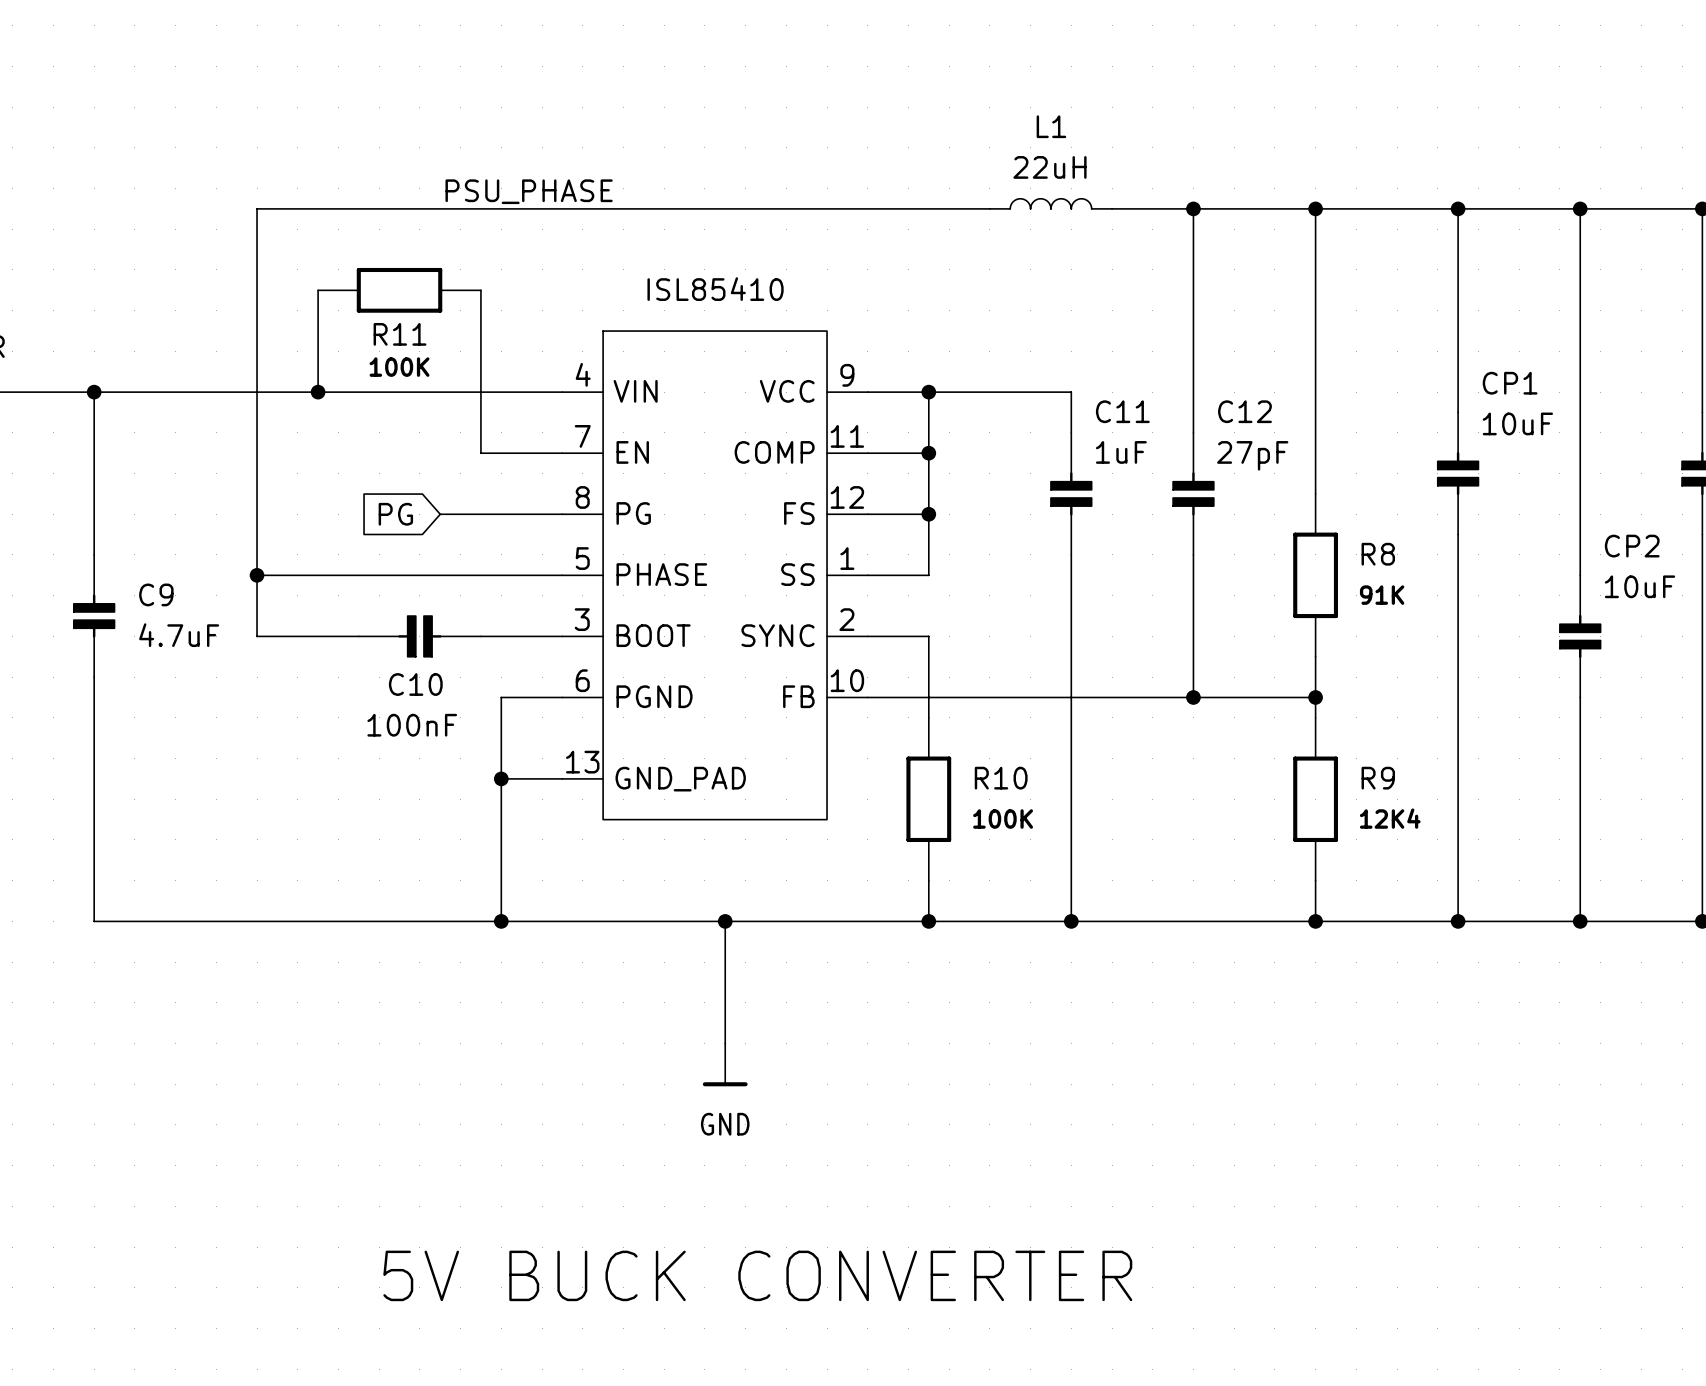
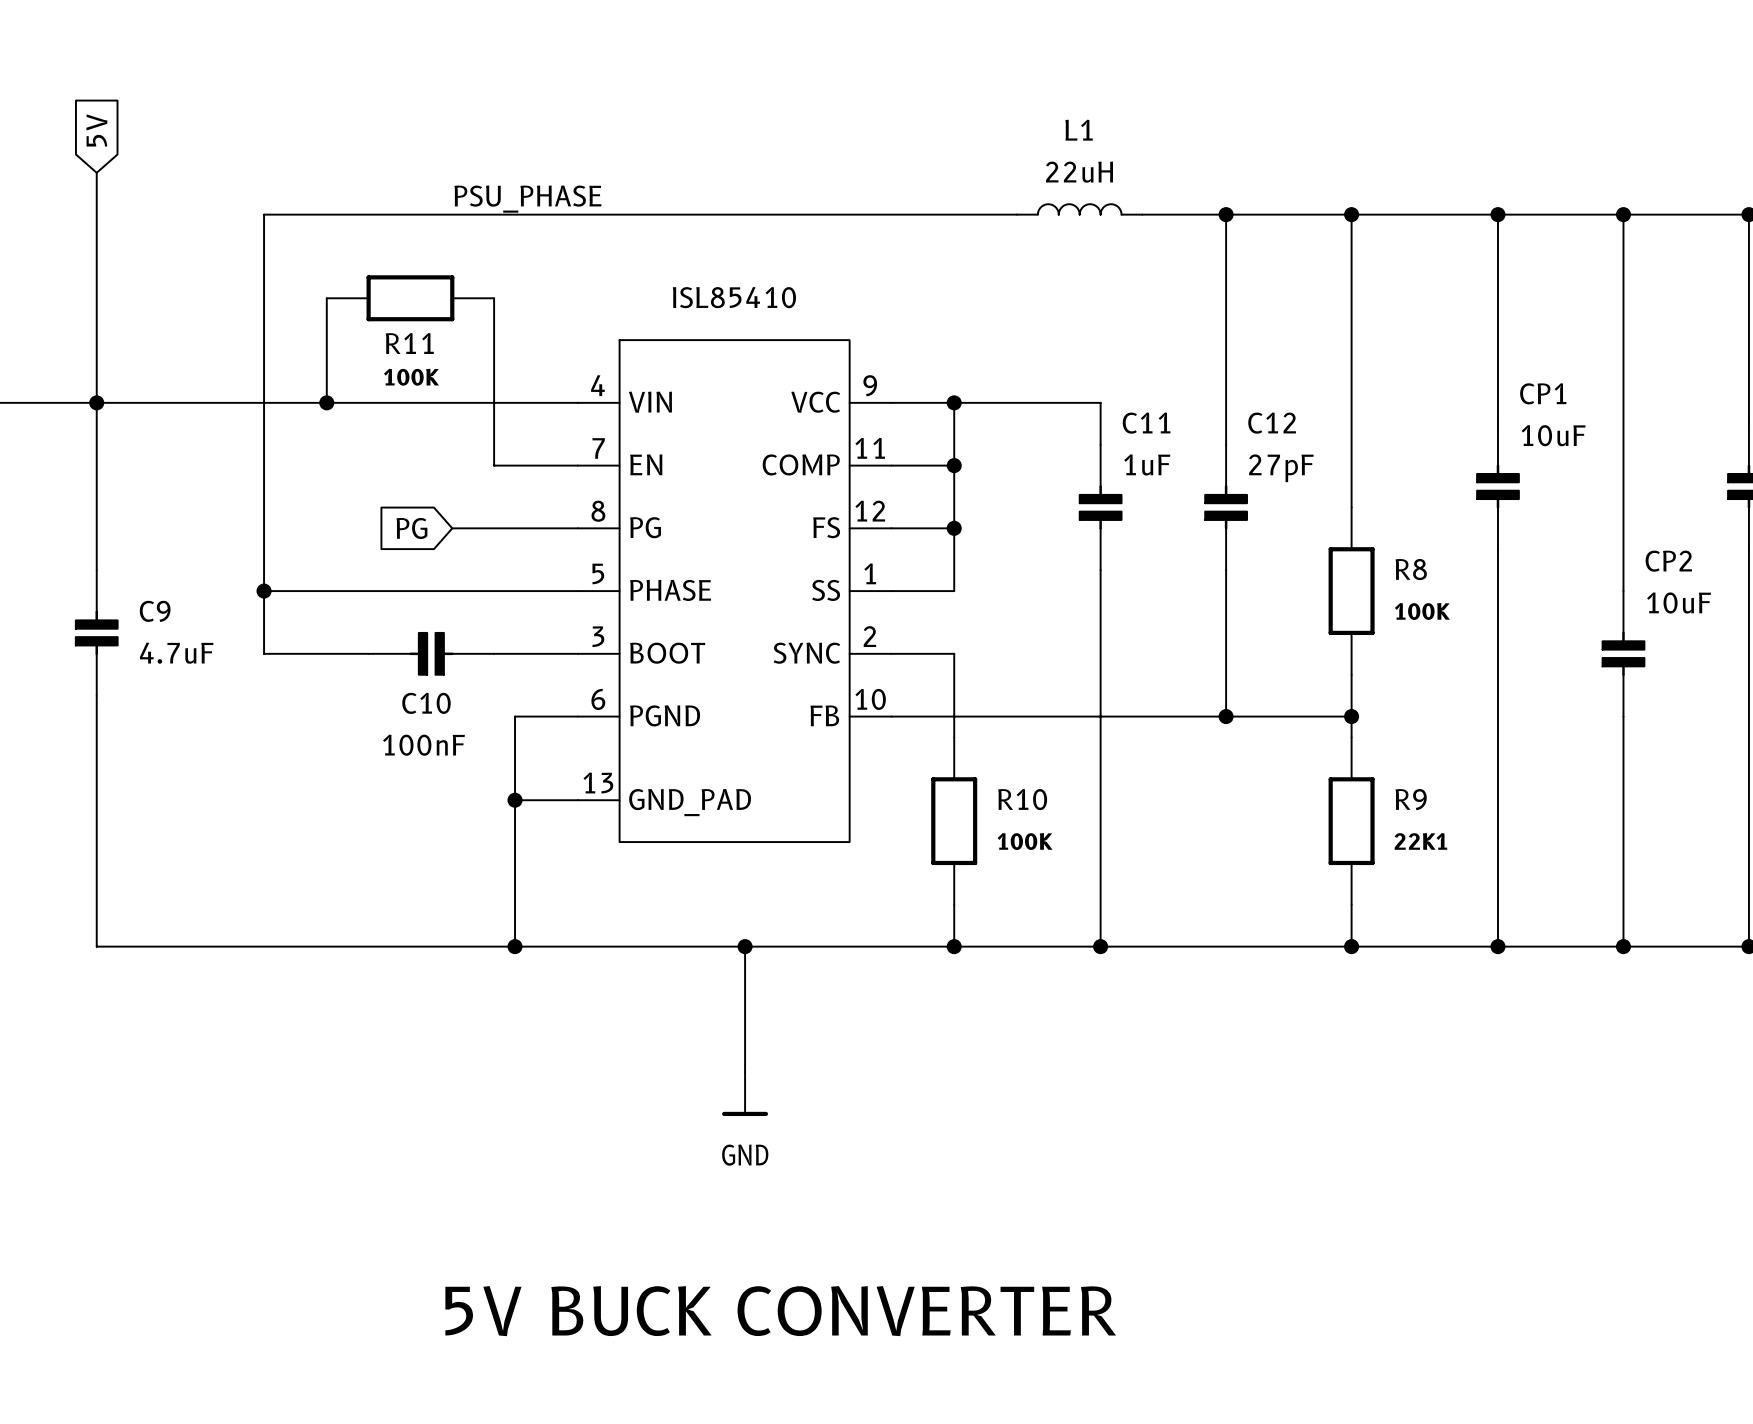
global label: none -> 5V (96, 130)
wire: none -> (96, 172) (96, 402)
R8 value: 91K (1382, 595) -> 100K (1422, 611)
R9 value: 12K4 (1390, 818) -> 22K1 (1420, 841)

